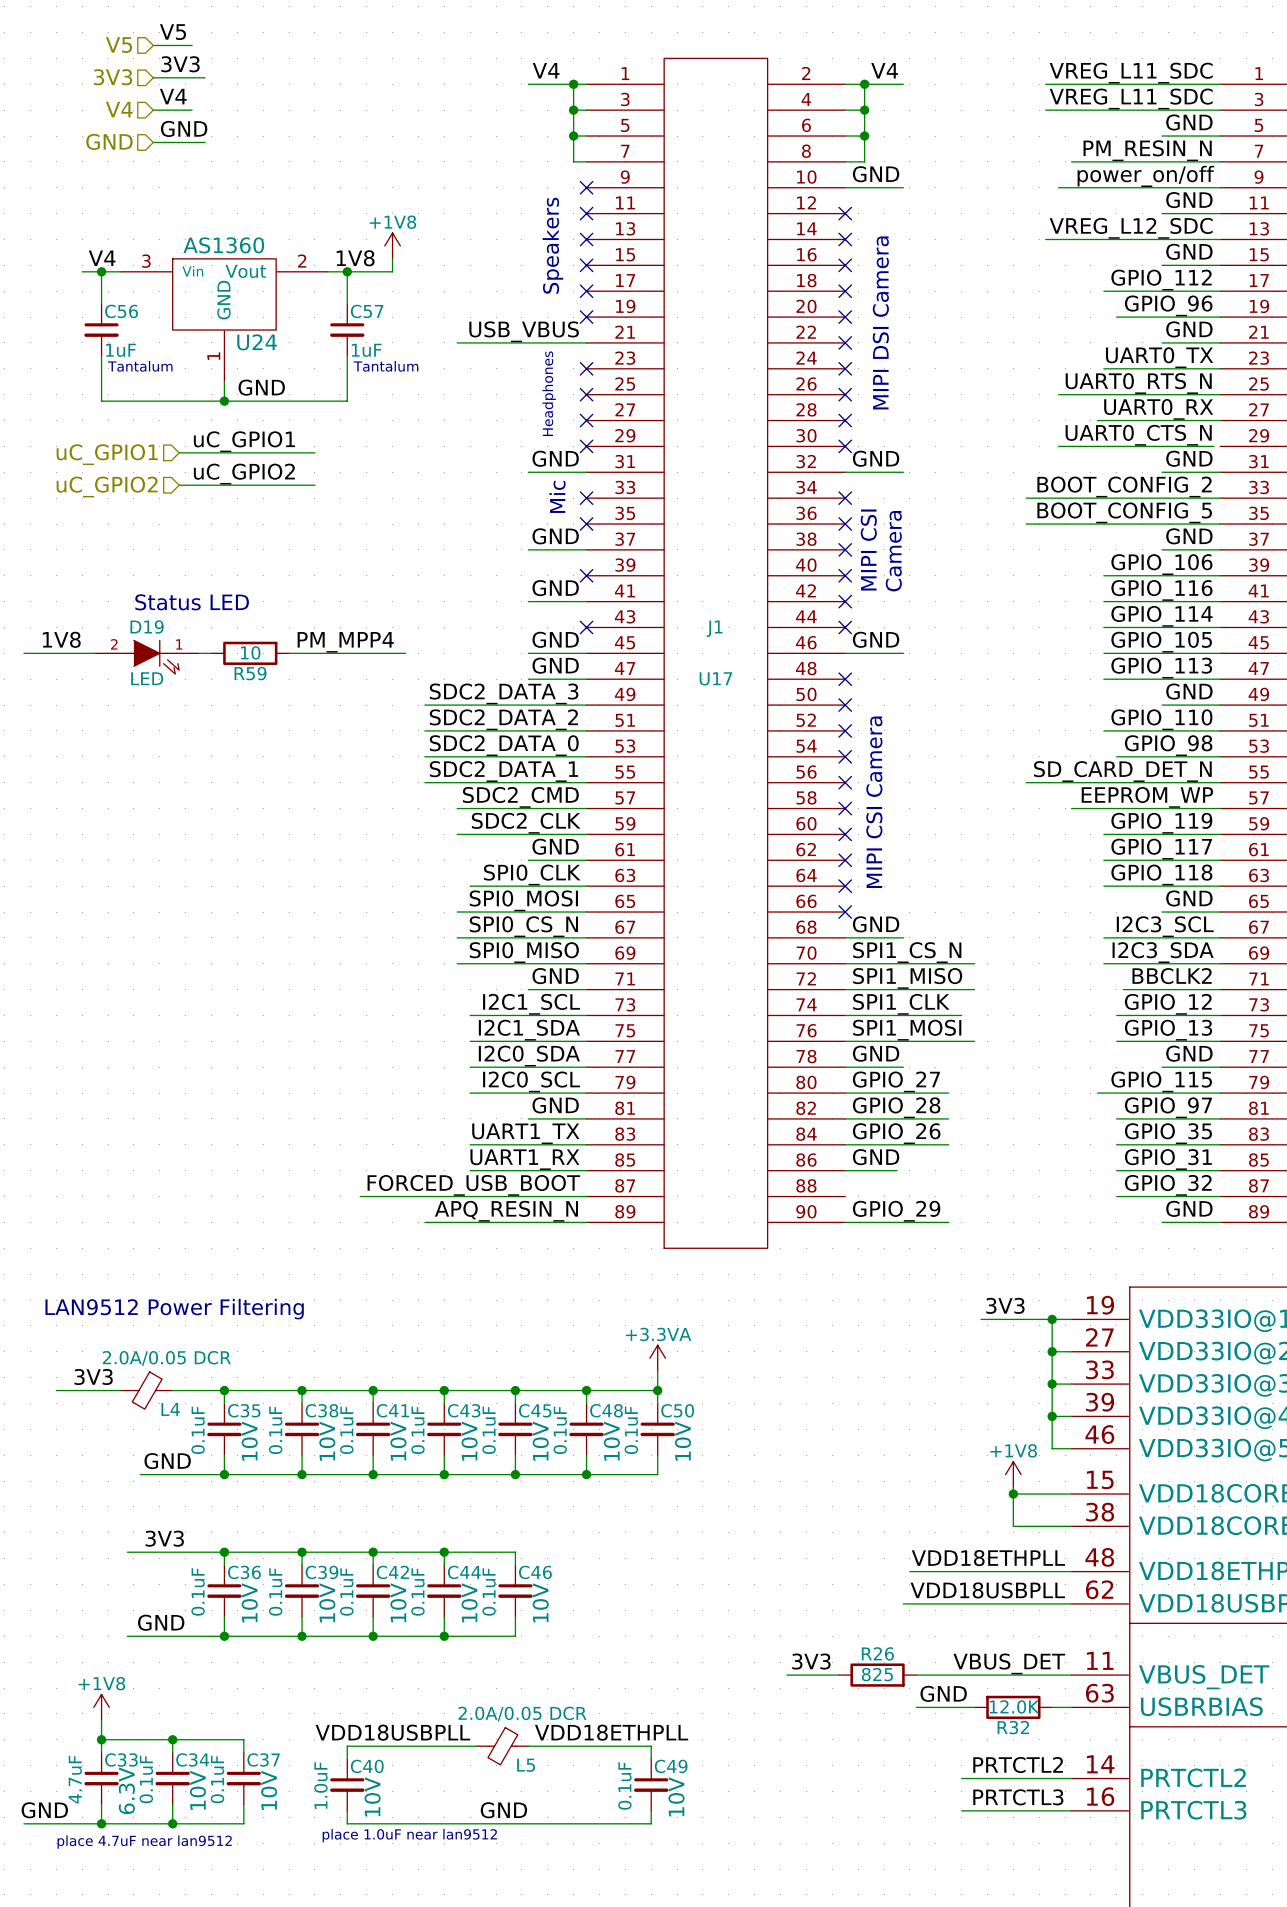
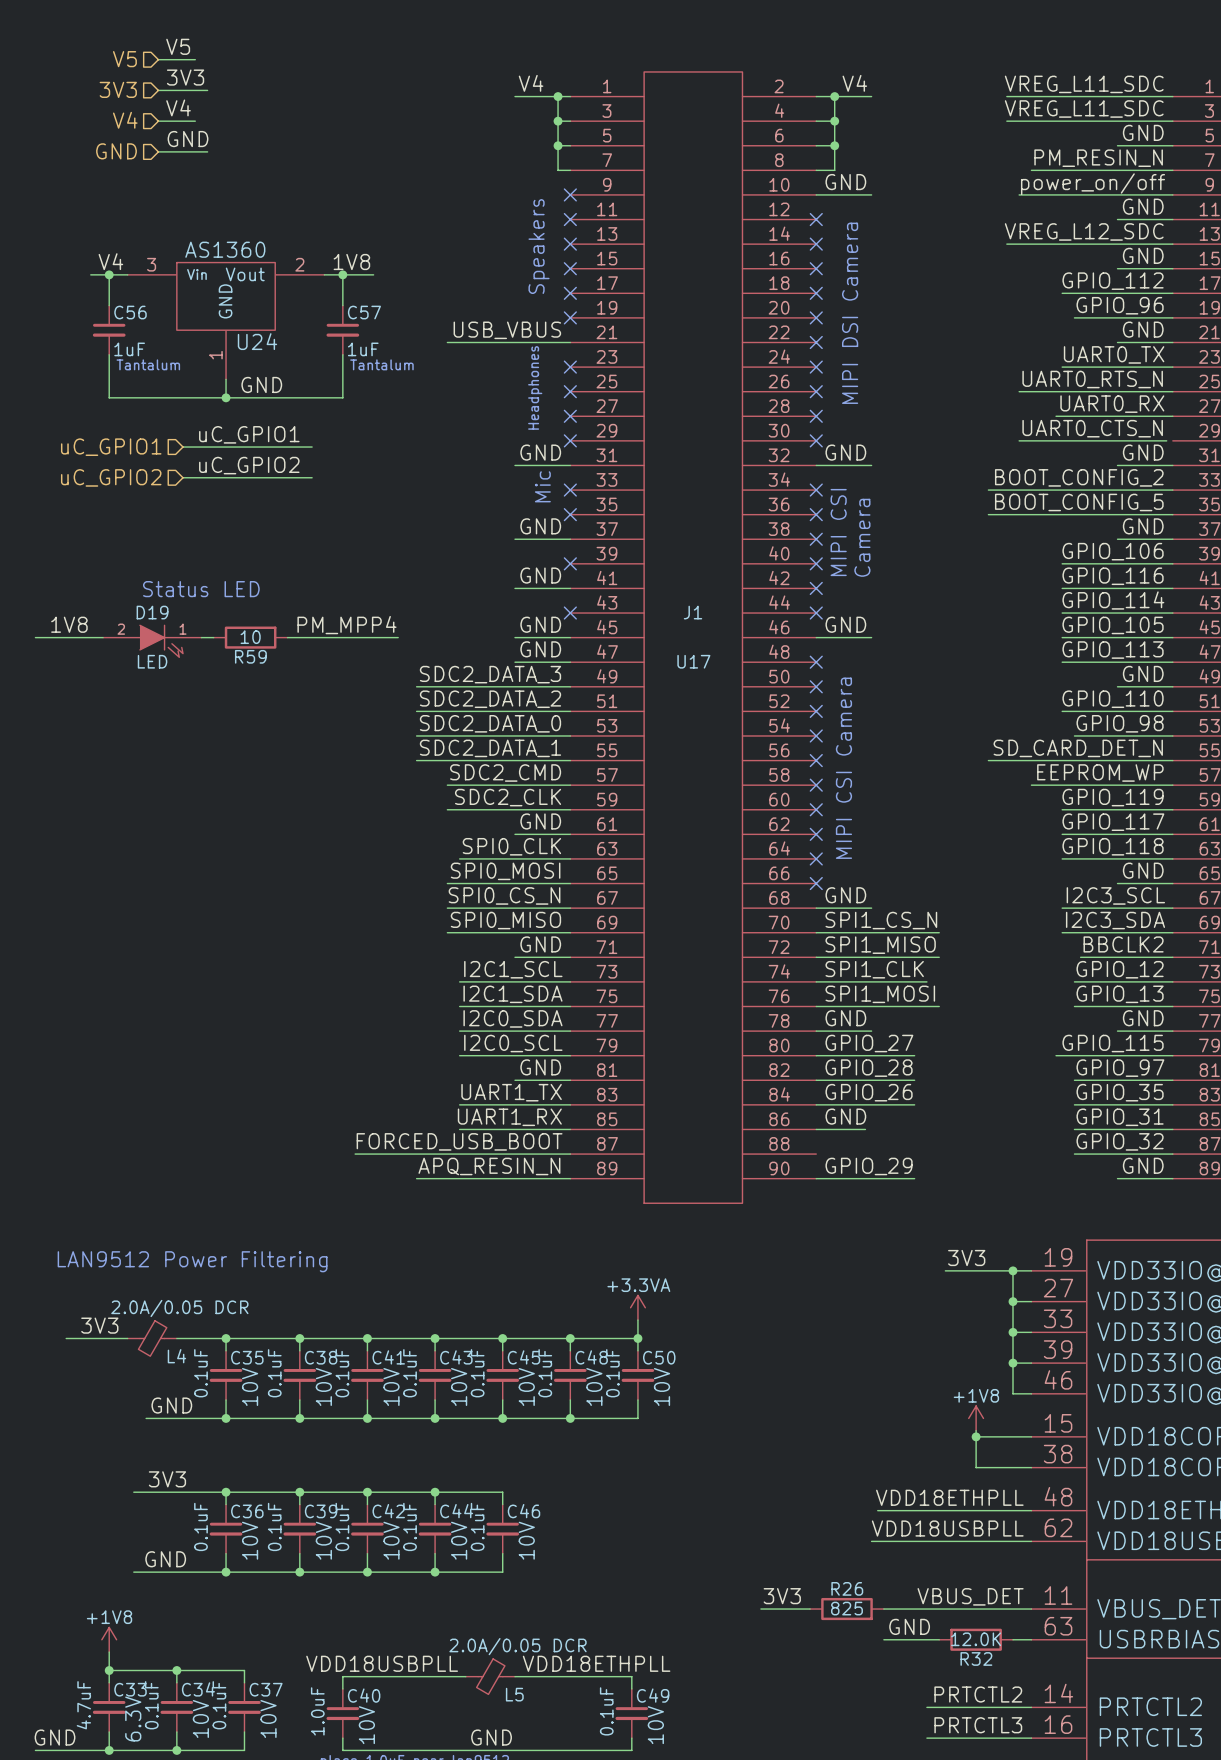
power symbol: +1V8 (392, 245) -> none
wire: (392, 258) (392, 271) (379, 271) -> none

